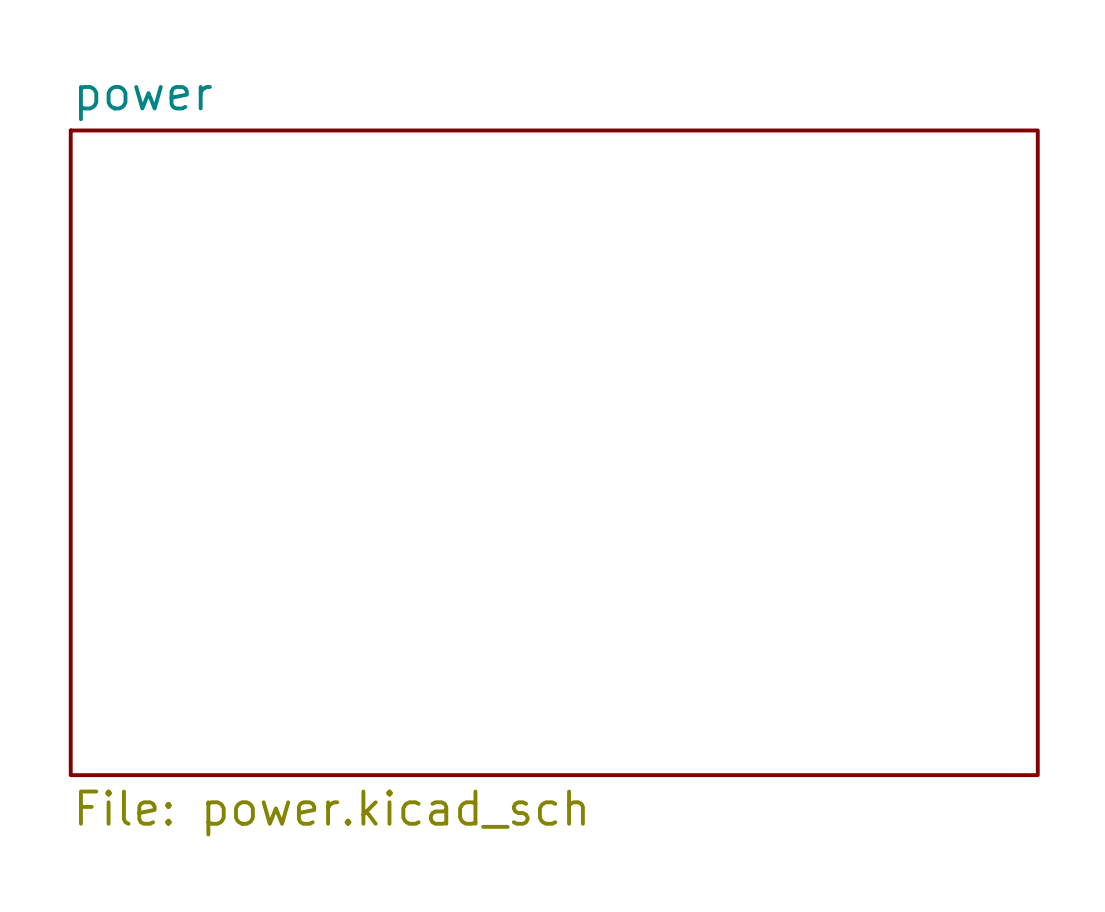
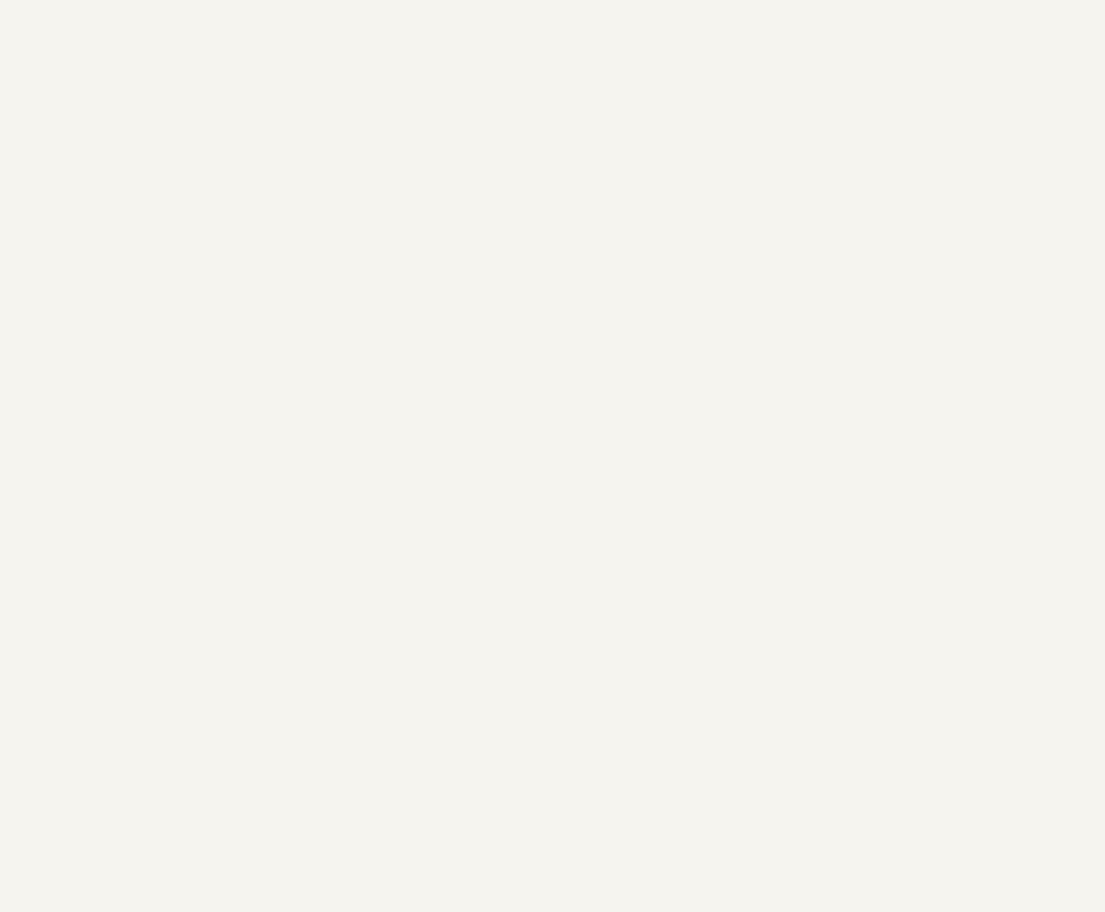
sheet power: File: power.kicad_sch (554, 452) -> none

